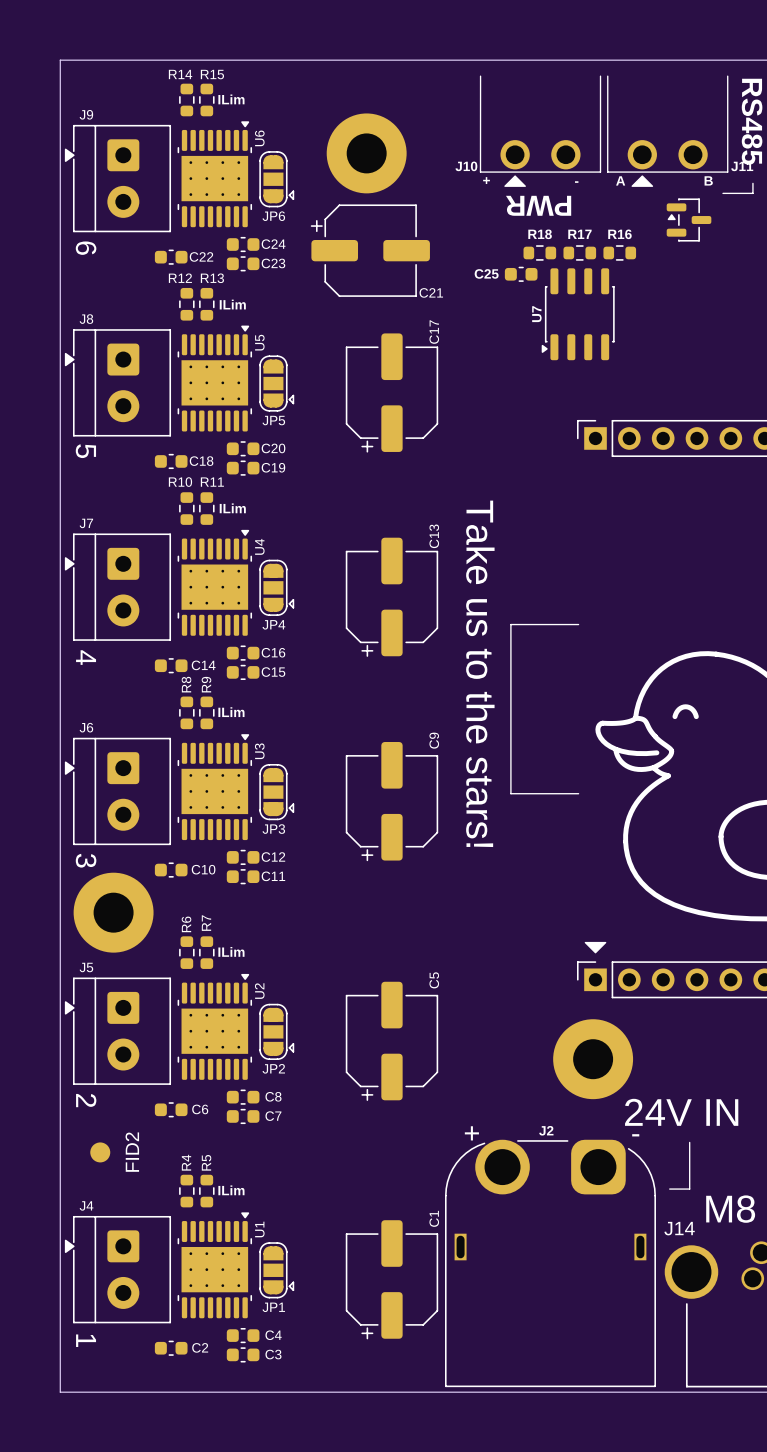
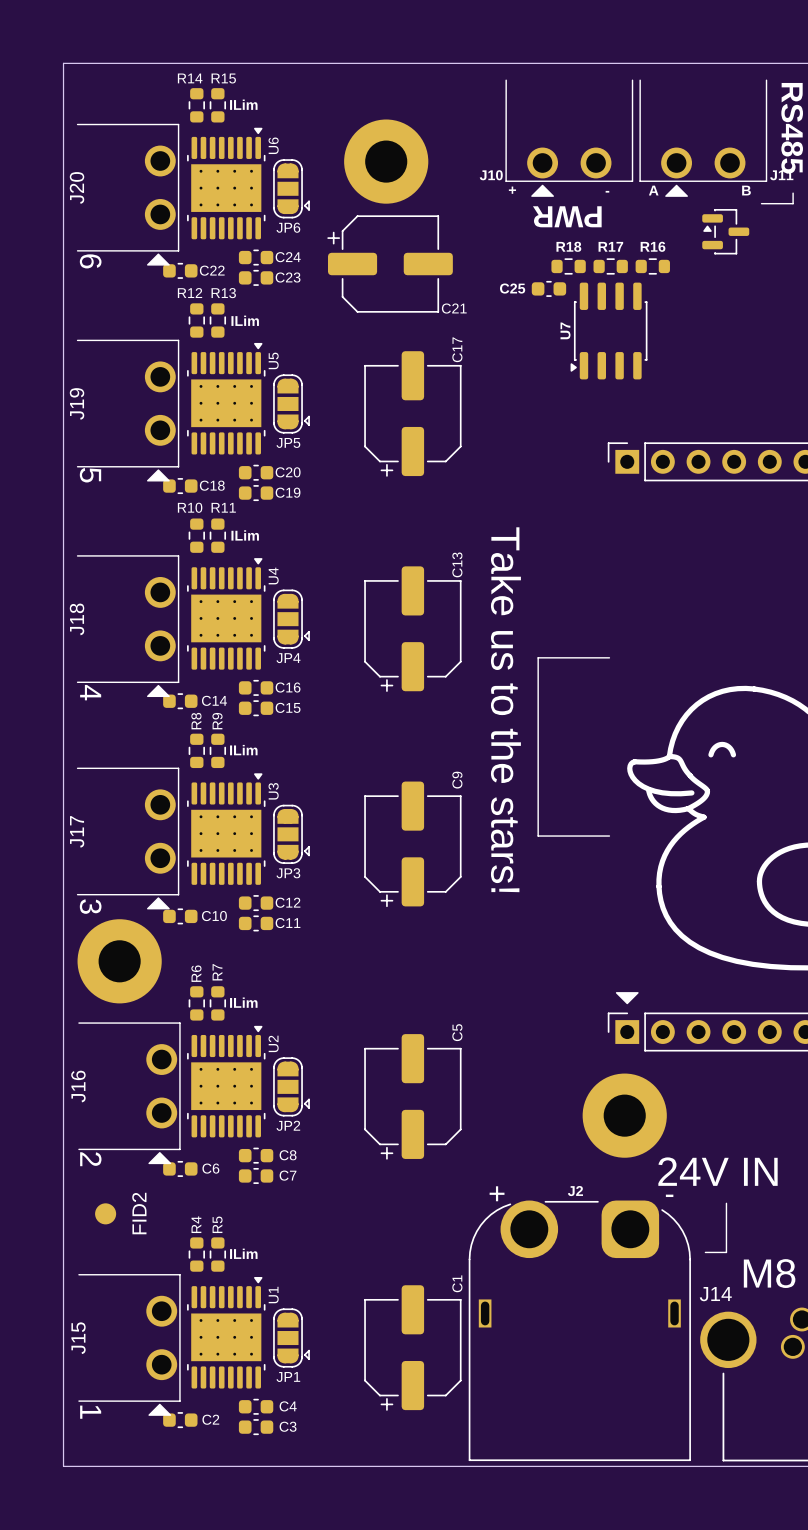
J9: (117, 178) -> none
J20: none -> (128, 194)
J8: (117, 382) -> none
J19: none -> (128, 410)
J7: (117, 587) -> none
J18: none -> (128, 626)
J6: (117, 791) -> none
J17: none -> (128, 838)
J5: (117, 1031) -> none
J16: none -> (129, 1093)
J4: (117, 1269) -> none
J15: none -> (129, 1344)

